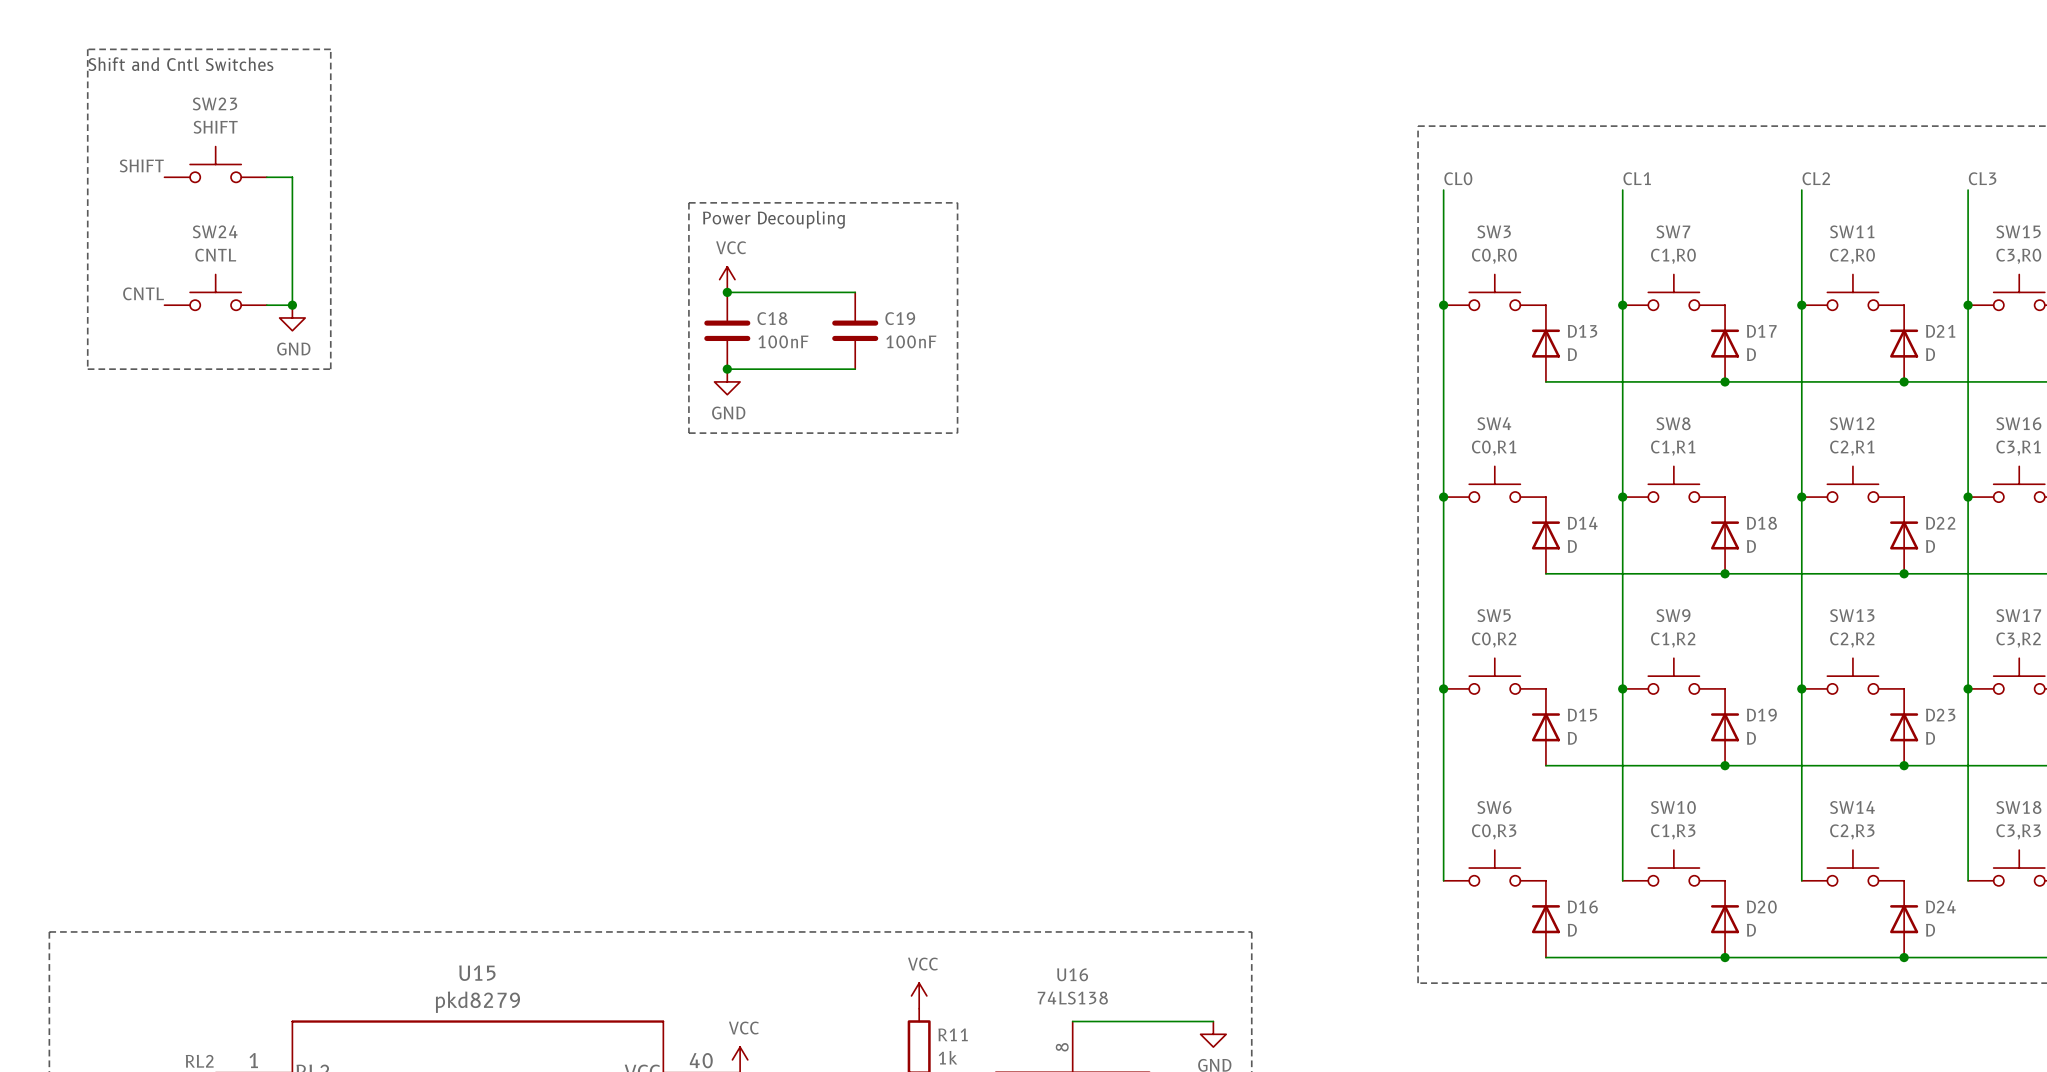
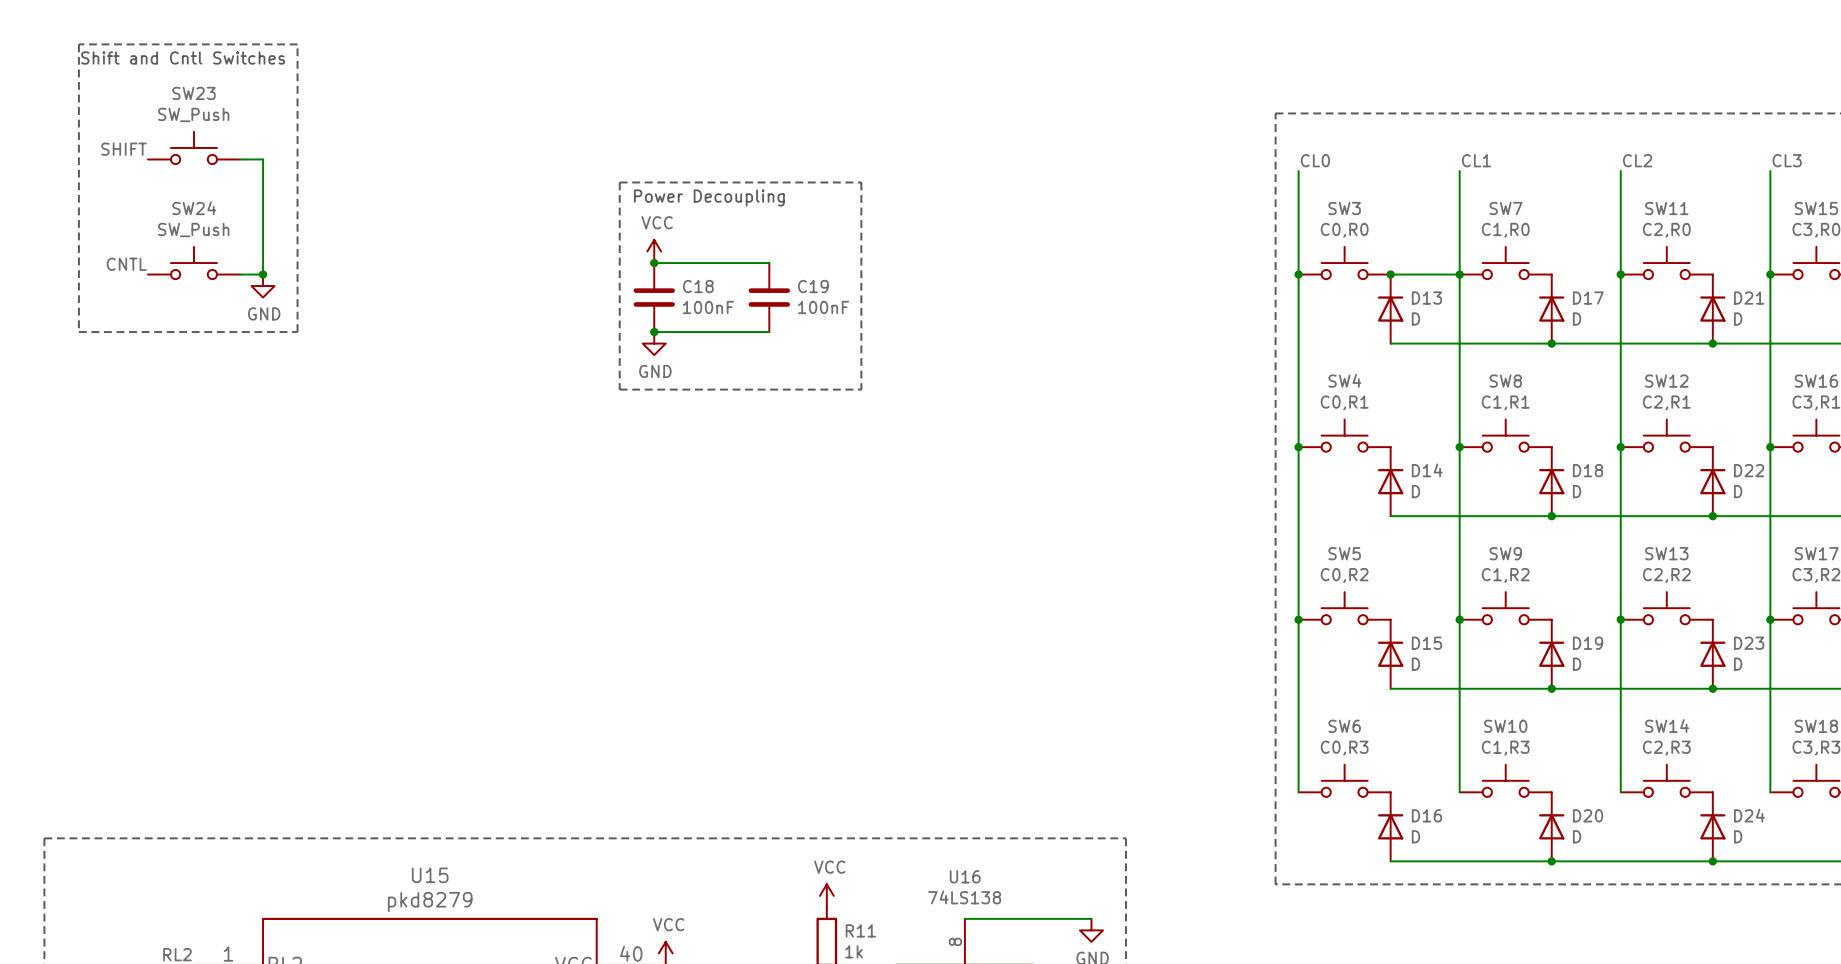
SW23 value: SHIFT (215, 127) -> SW_Push (193, 114)
SW24 value: CNTL (215, 255) -> SW_Push (193, 230)
wire: none -> (1390, 274) (1459, 274)
junction: none -> (1390, 274)

